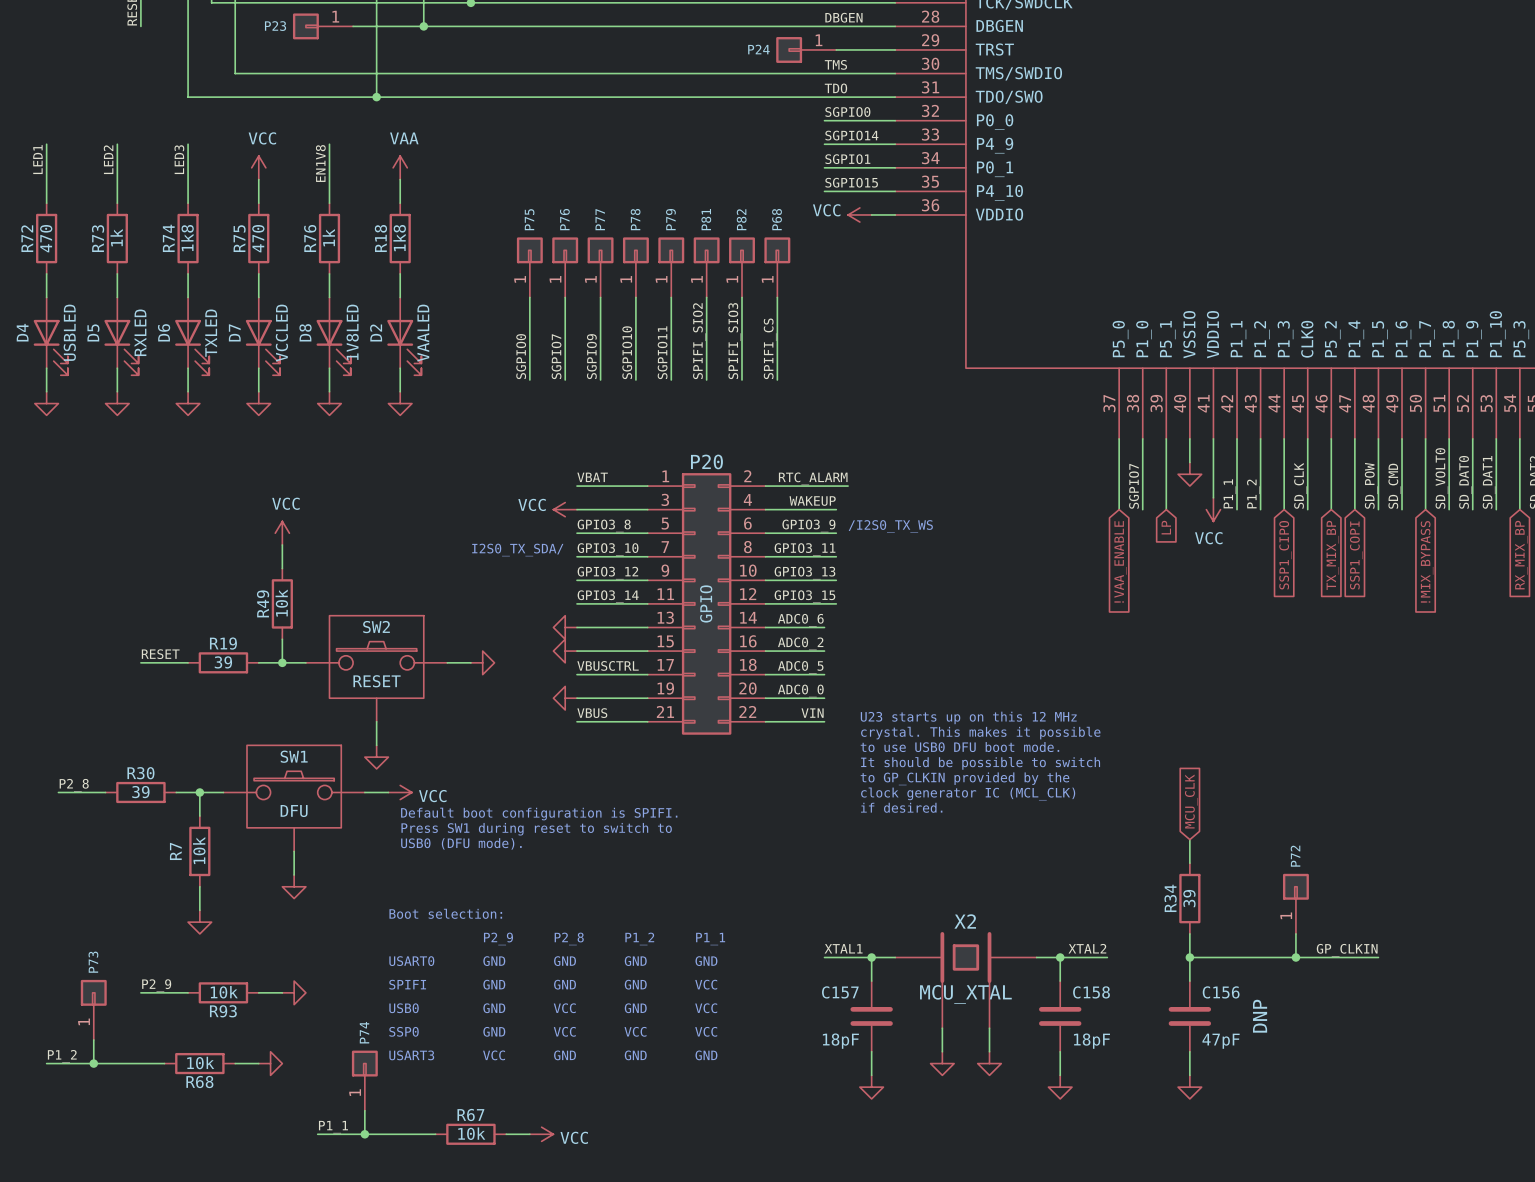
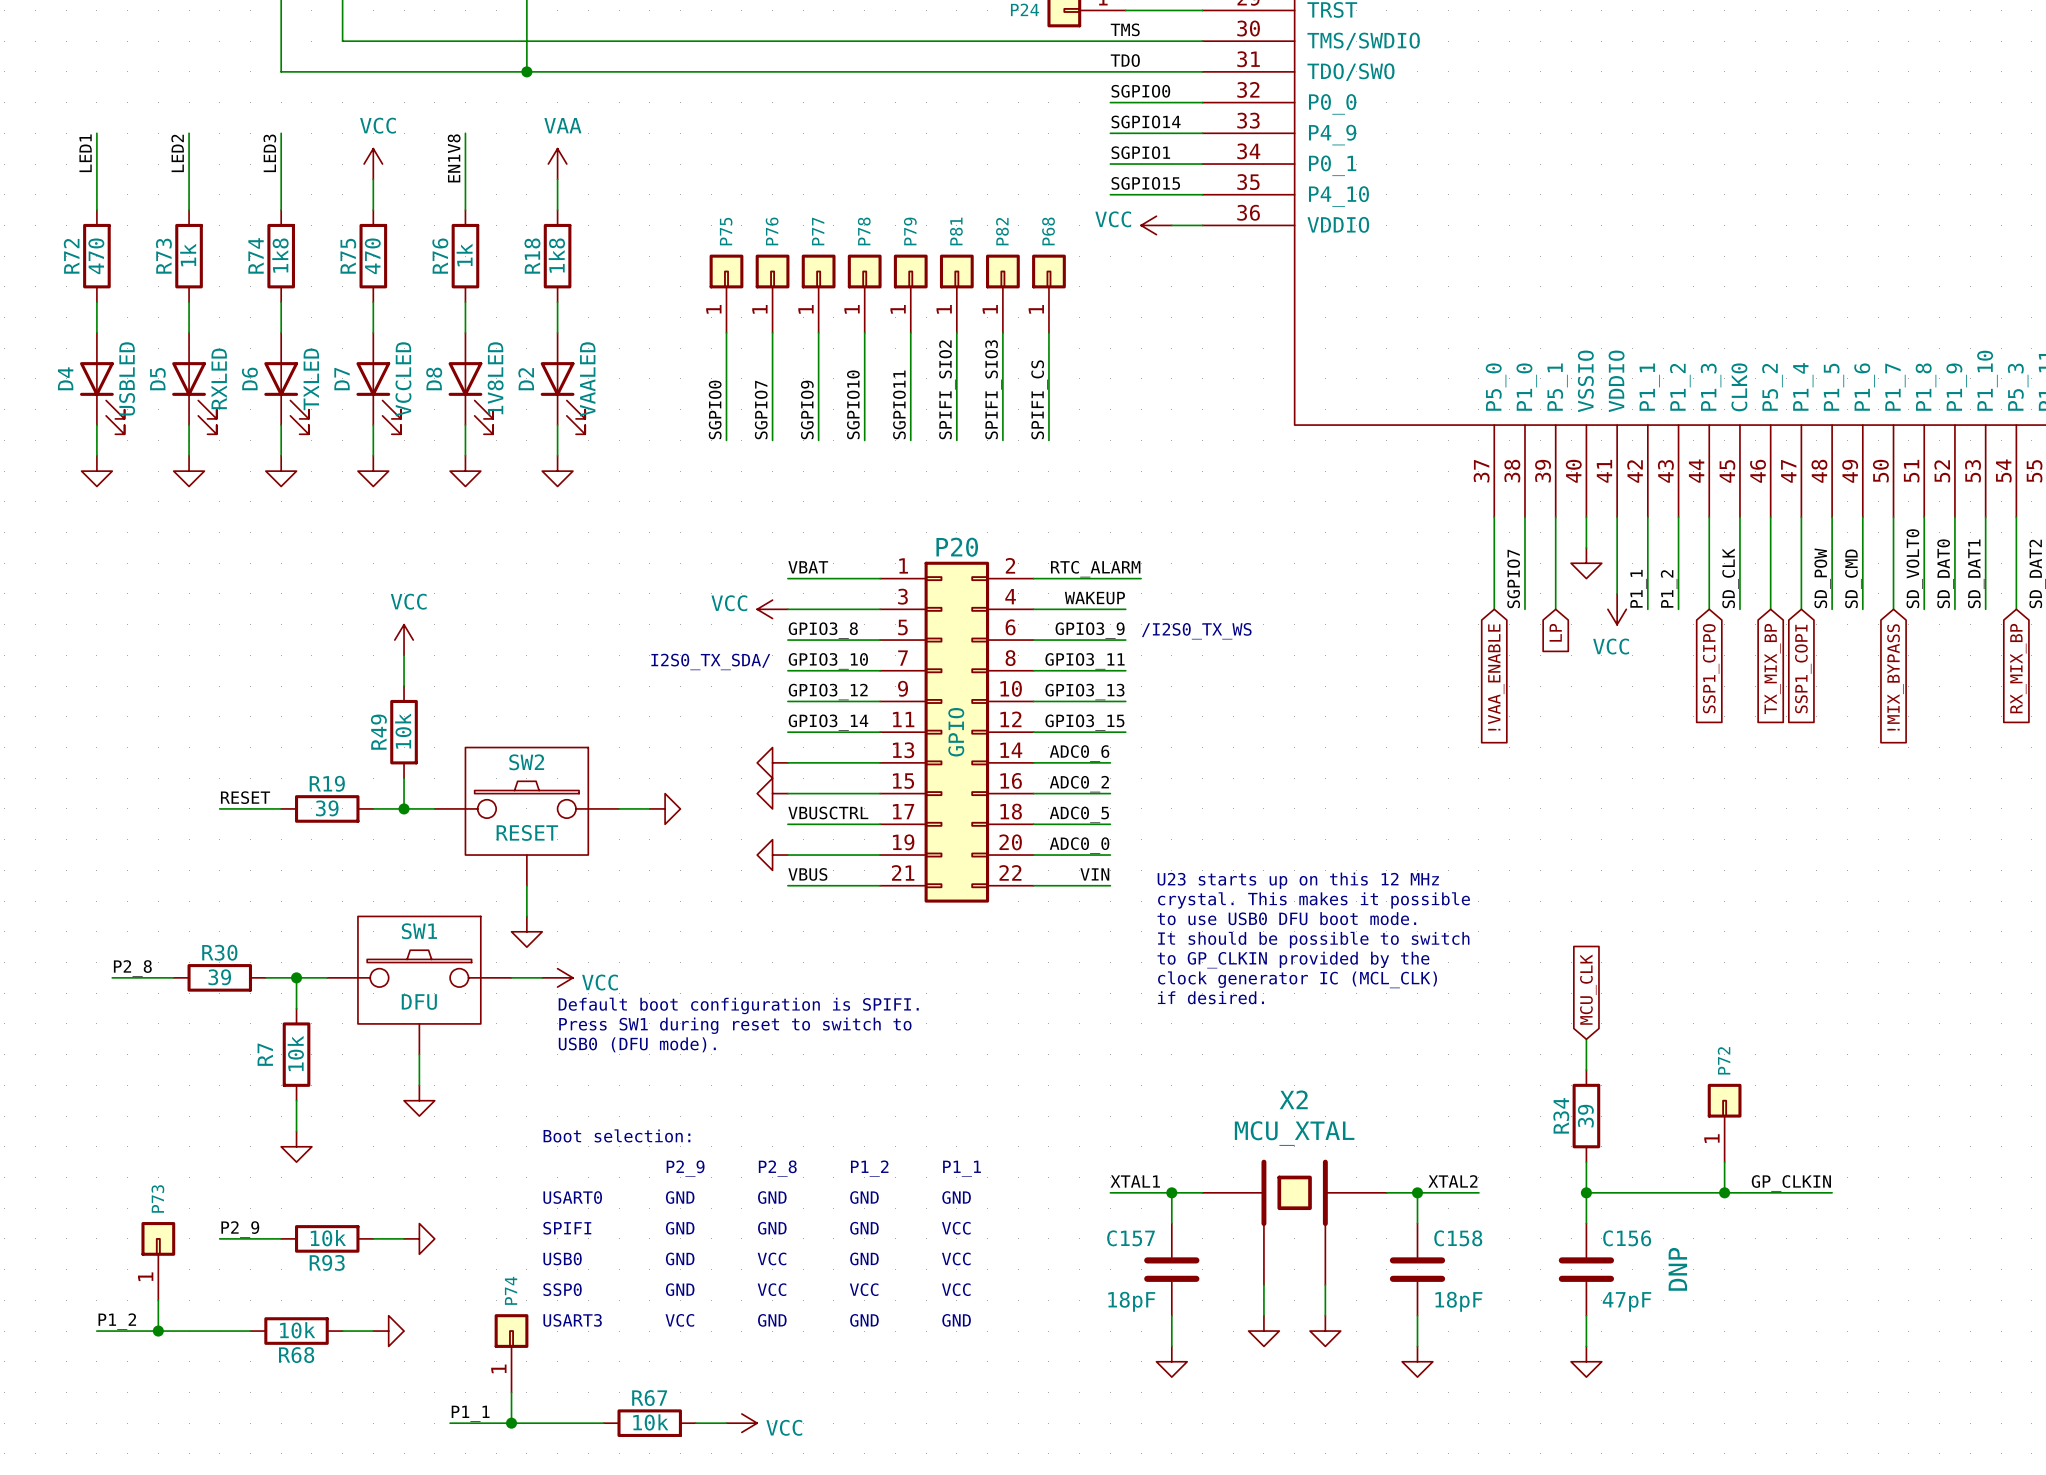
X2 name position: X2 (965, 921) -> X2 (1293, 1099)
X2 value position: MCU_XTAL (965, 994) -> MCU_XTAL (1294, 1133)

